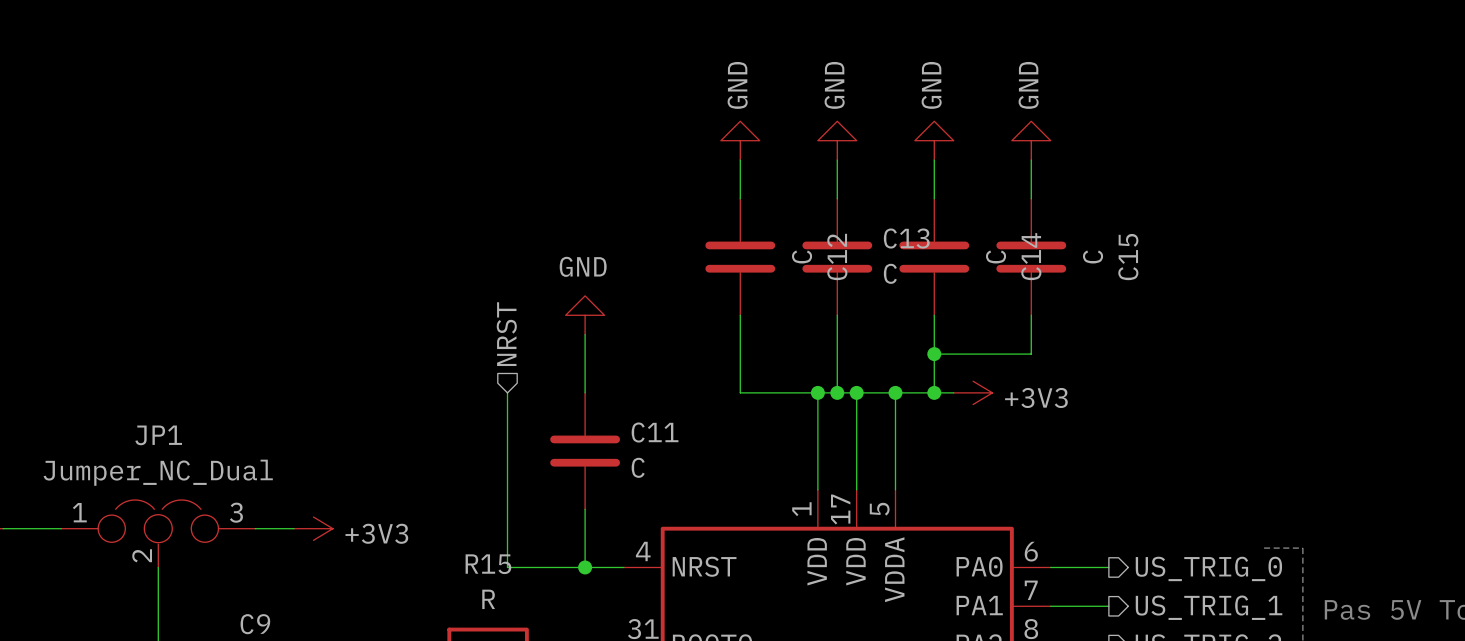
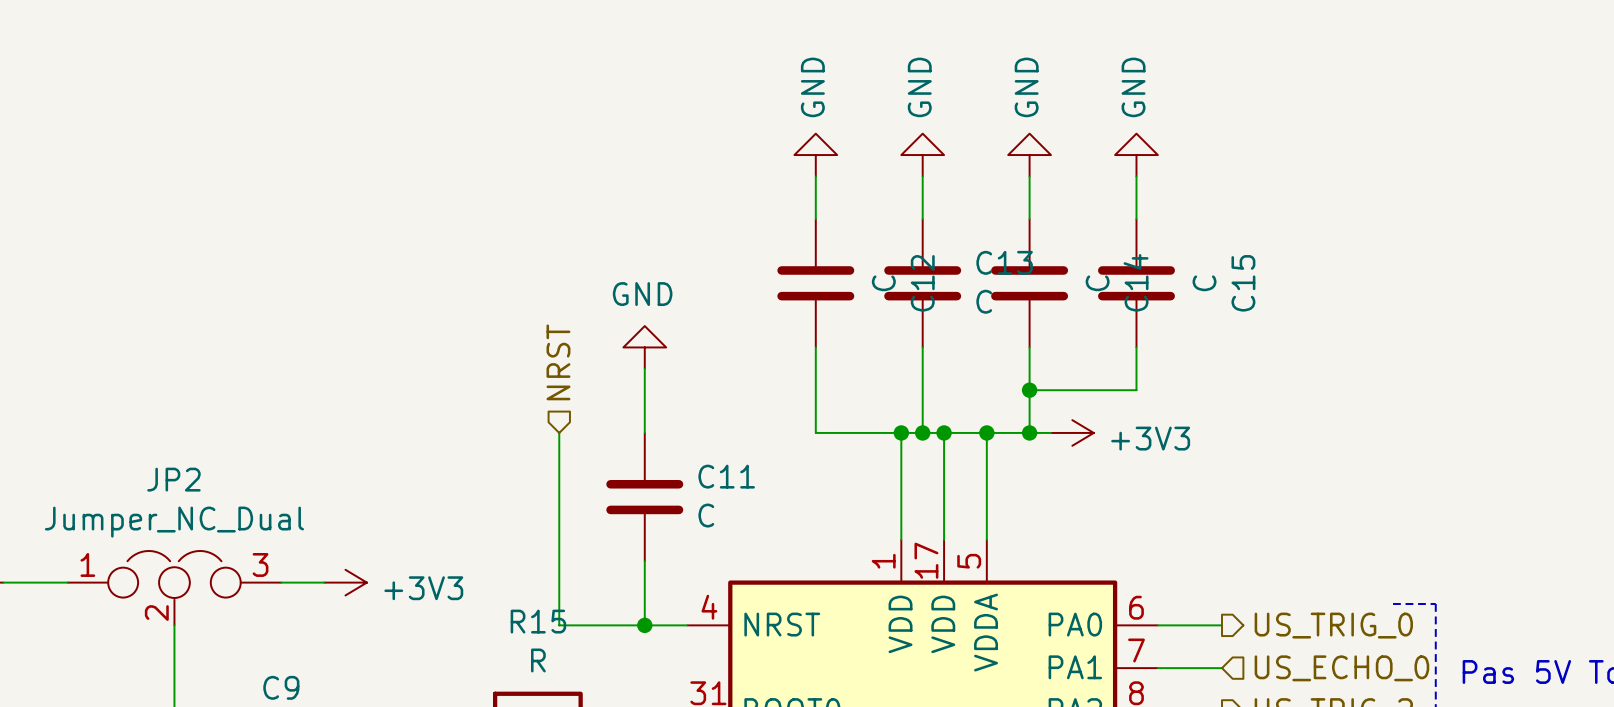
JP1 name: JP1 (158, 435) -> JP2 (173, 479)
hierarchical label shape: output (1209, 607) -> input (1341, 668)
hierarchical label: US_TRIG_1 (1209, 607) -> US_ECHO_0 (1341, 668)

